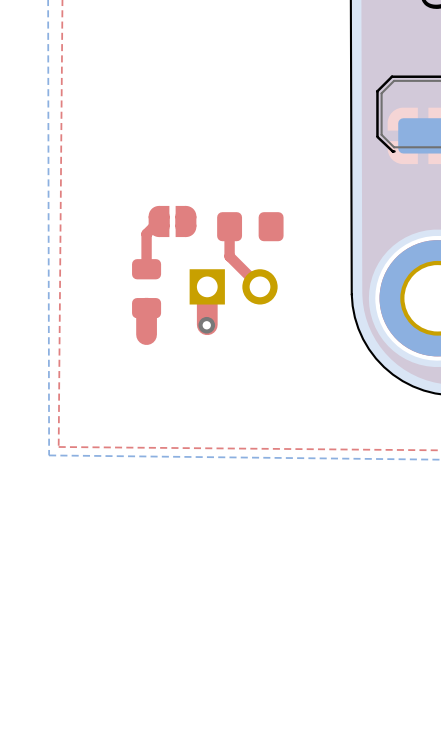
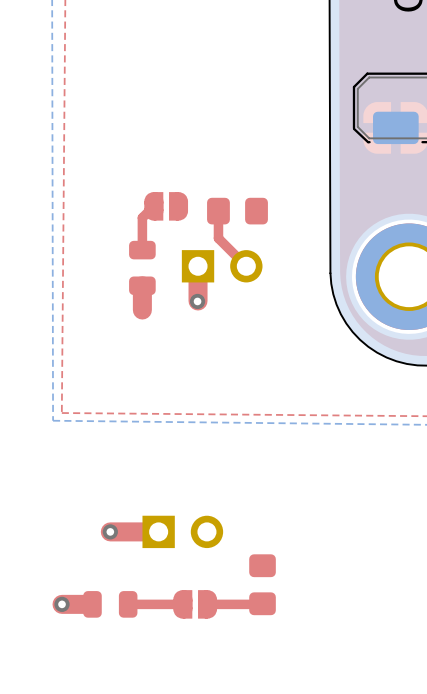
via: none -> (110, 531)
top track: none -> (158, 531) (110, 531)
part: none -> (182, 531)
part: none -> (262, 584)
via: none -> (62, 604)
top track: none -> (86, 604) (62, 604)
part: none -> (110, 604)
top track: none -> (182, 604) (128, 604)
part: none -> (195, 604)
top track: none -> (255, 604) (207, 604)

